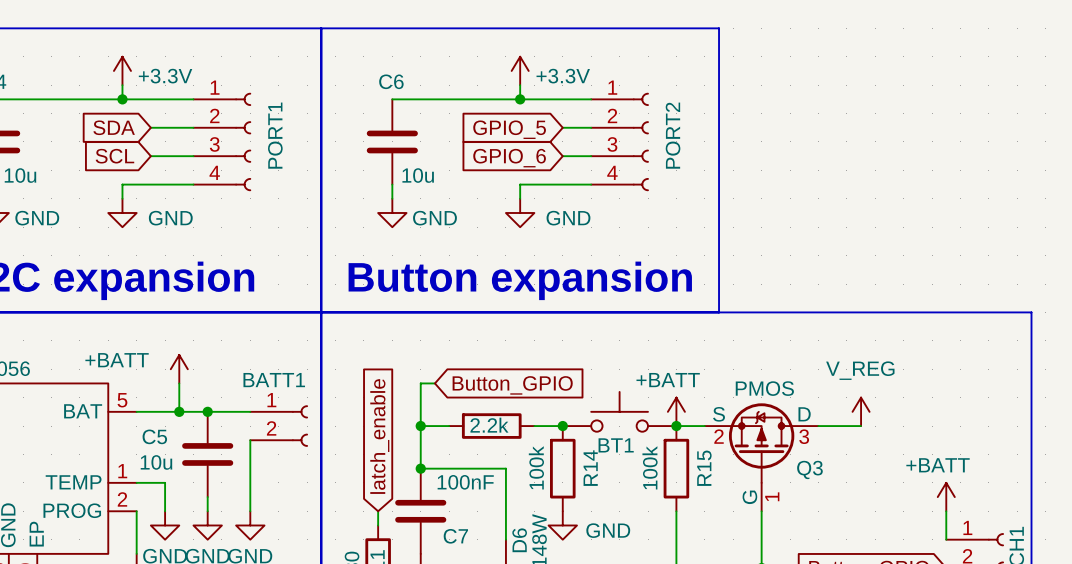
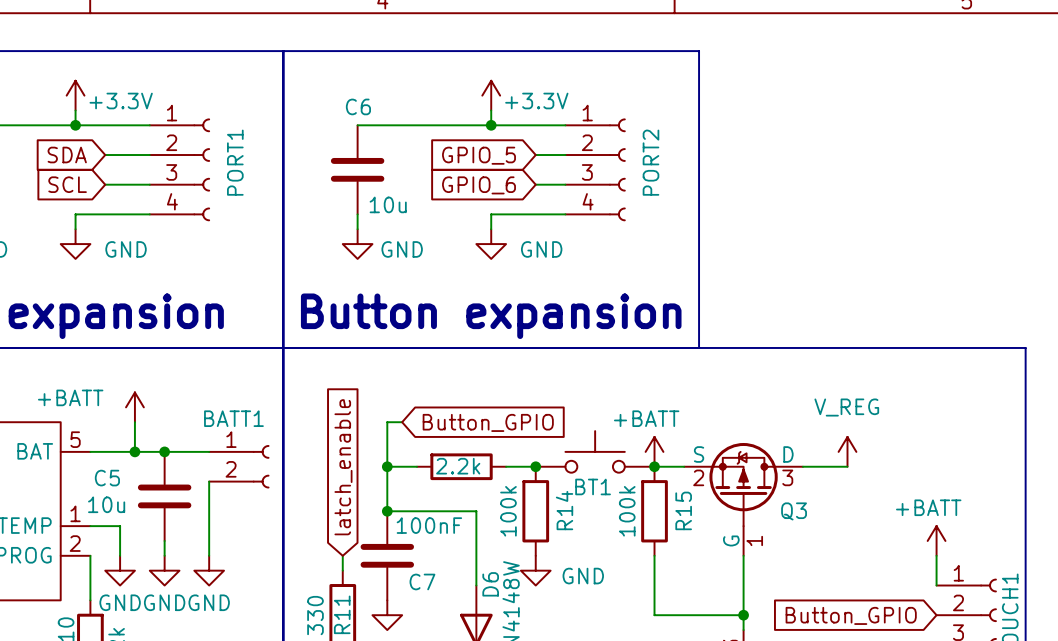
Q3 value: PMOS (764, 388) -> none

